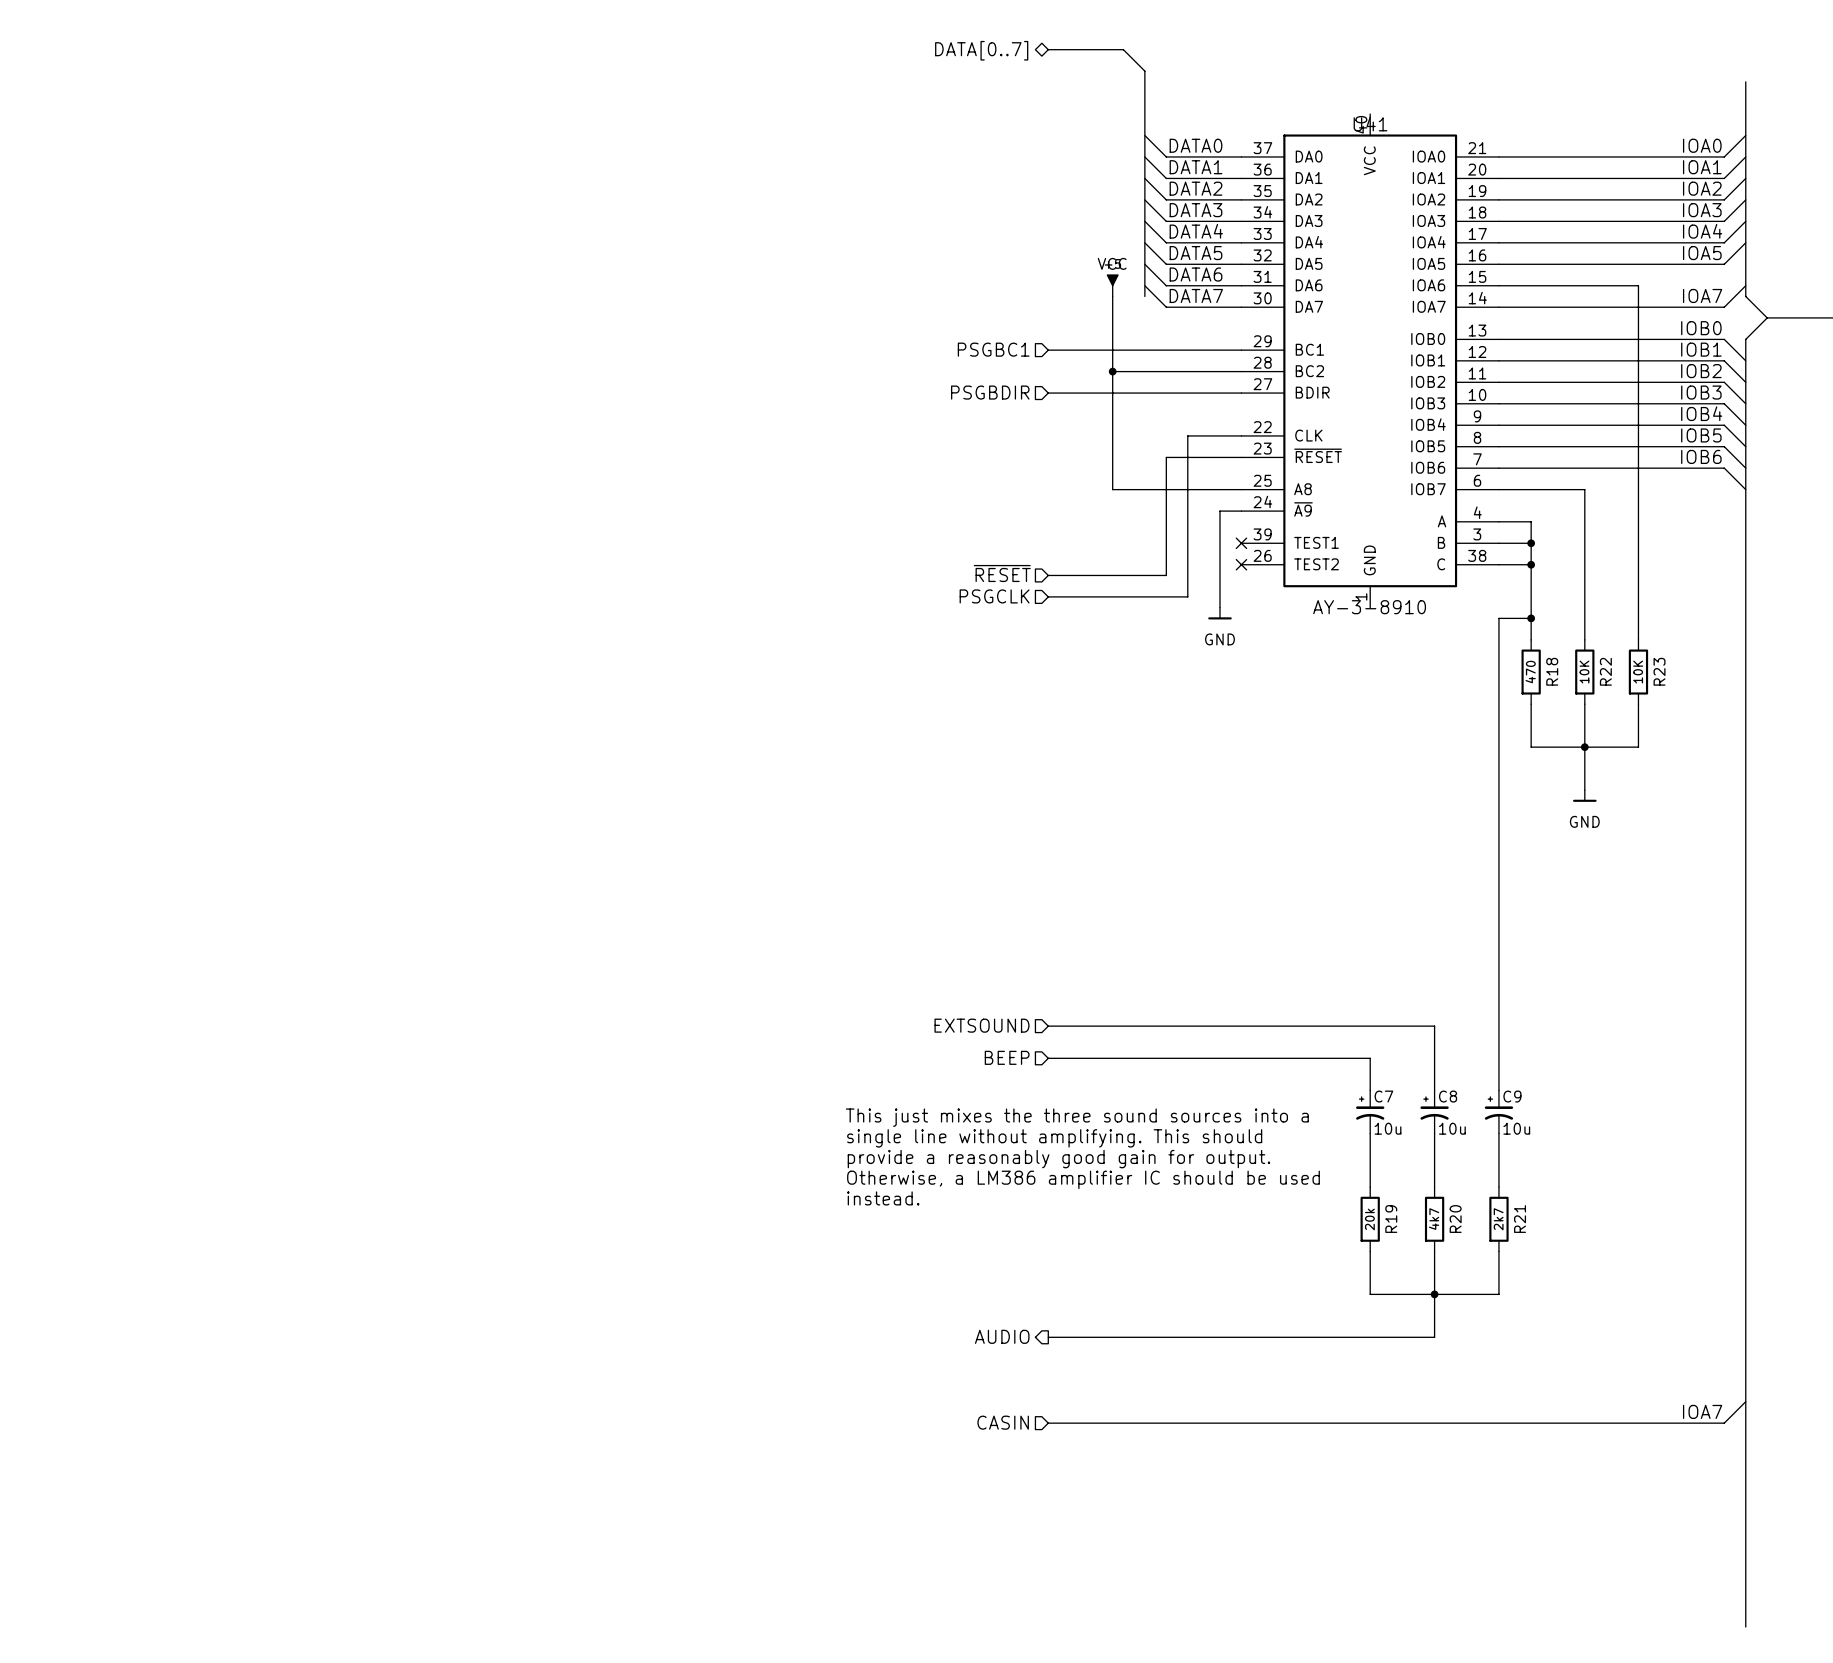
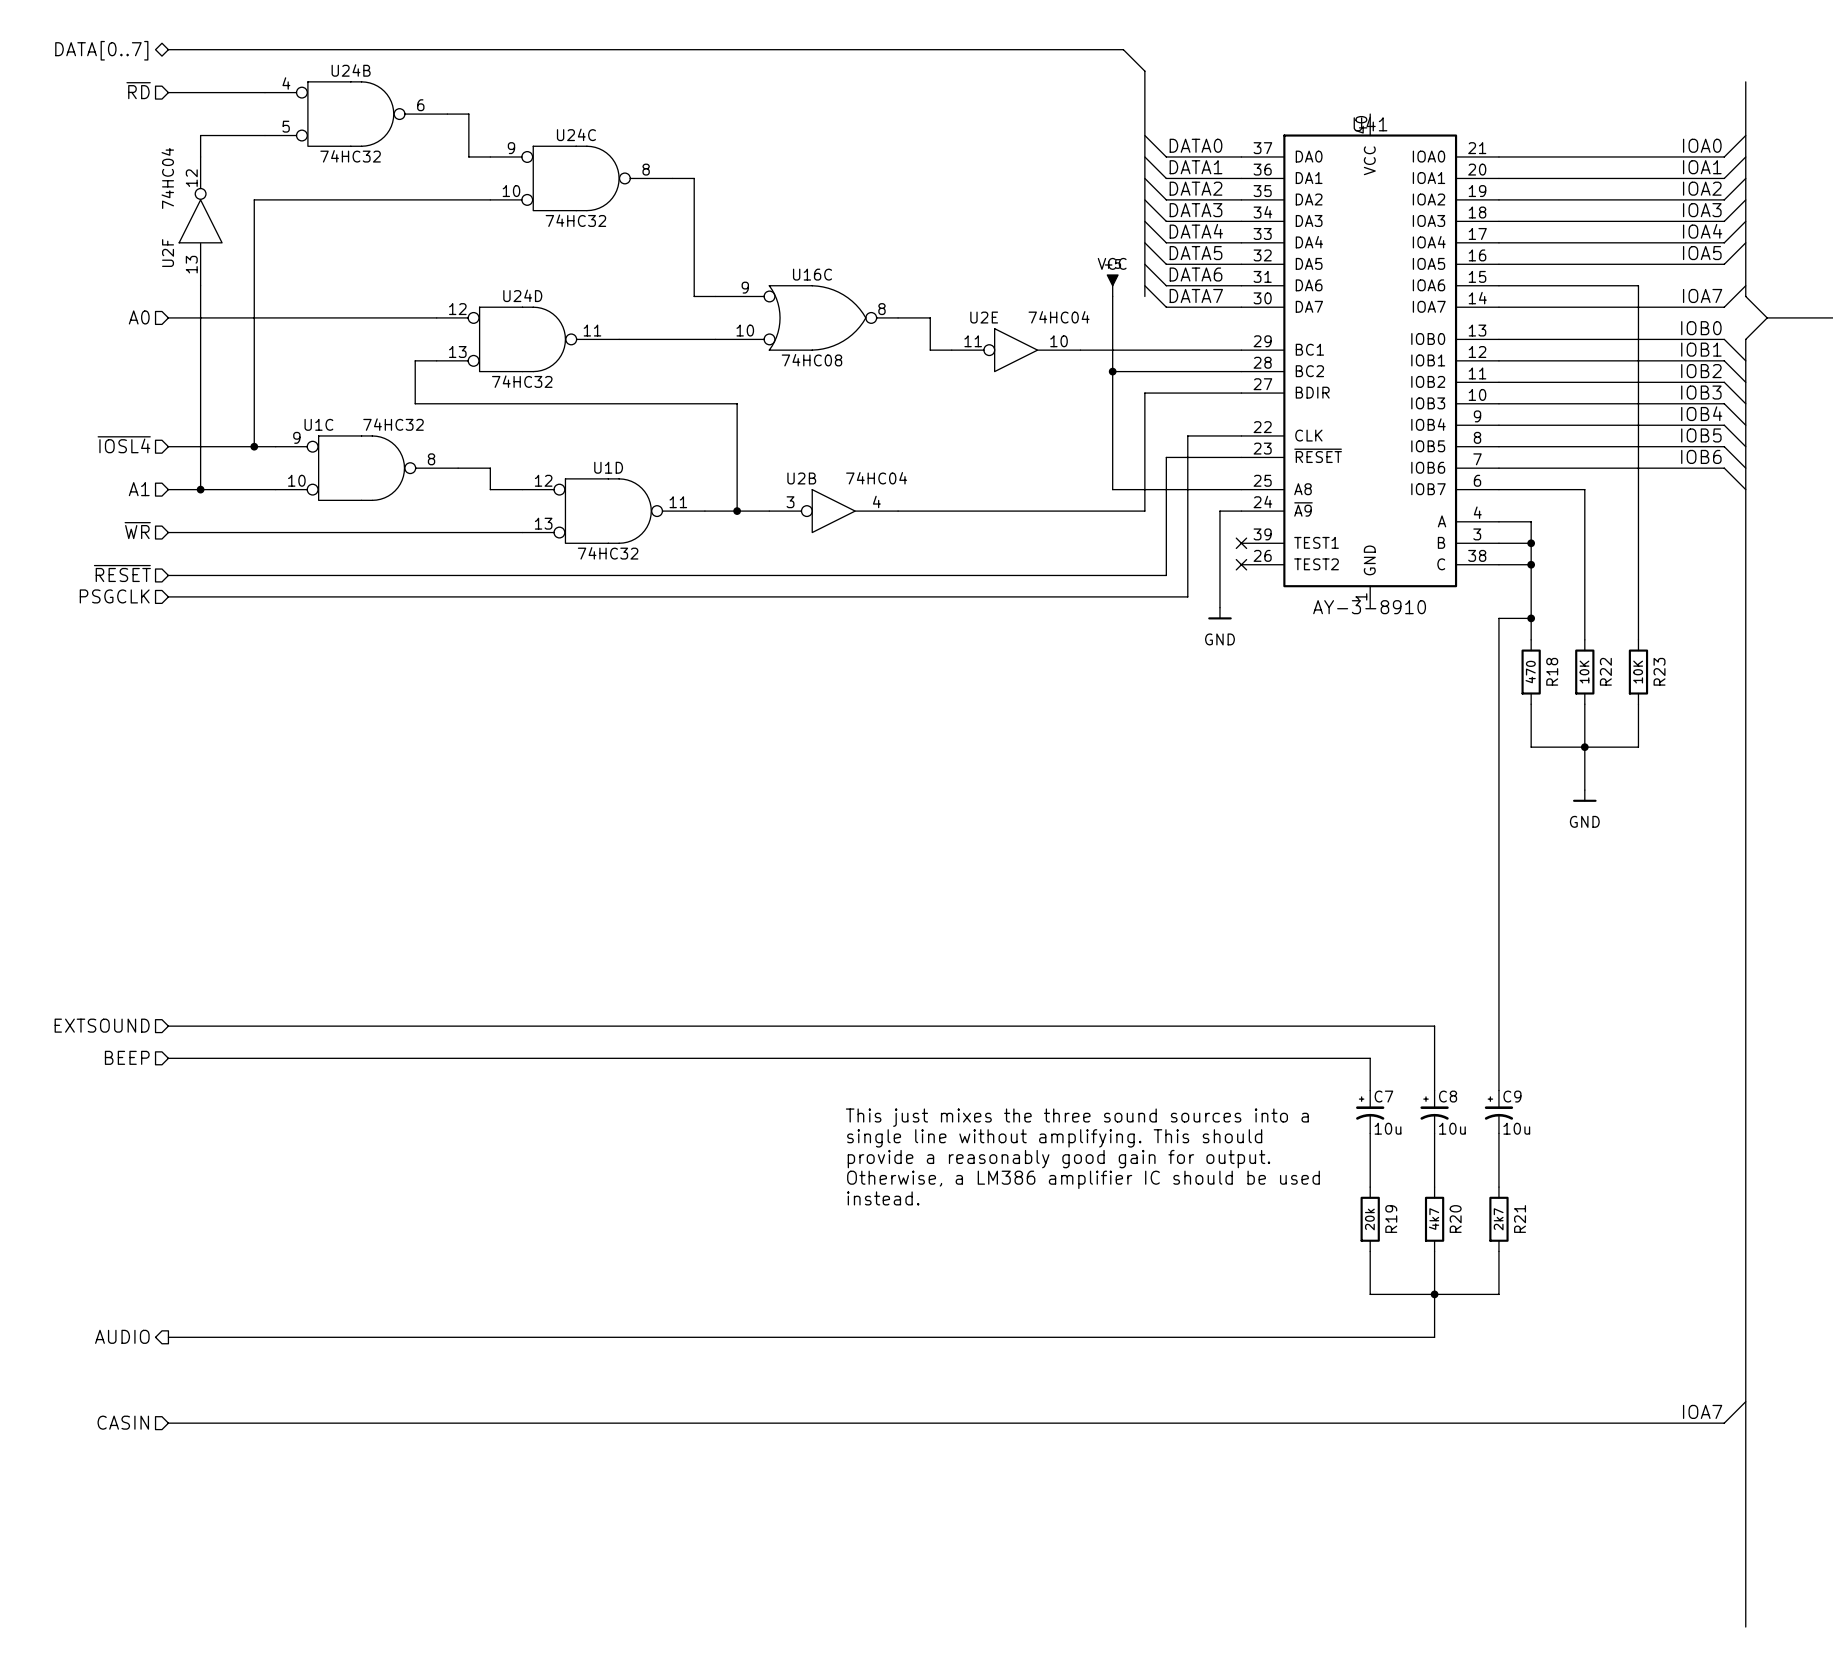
bus: none -> (168, 49) (1048, 49)
hierarchical label: none -> DATA[0..7] (101, 50)
hierarchical label: DATA[0..7] (981, 50) -> none
hierarchical label: none -> ~{RD} (138, 90)
wire: none -> (168, 92) (265, 92)
U24B: none -> 74HC32 (356, 114)
wire: none -> (447, 114) (468, 114) (468, 156) (490, 156)
wire: none -> (265, 135) (200, 135) (200, 156)
U24C: none -> 74HC32 (581, 178)
wire: none -> (672, 178) (694, 178) (694, 296) (715, 296)
wire: none -> (490, 199) (254, 199) (254, 446)
U2F: none -> 74HC04 (200, 221)
wire: none -> (200, 285) (200, 489)
hierarchical label: none -> A0 (139, 317)
wire: none -> (168, 317) (436, 317)
U16C: none -> 74HC08 (806, 317)
wire: none -> (898, 317) (930, 317) (930, 350) (951, 350)
U24D: none -> 74HC32 (527, 339)
wire: none -> (619, 339) (715, 339)
hierarchical label: PSGBC1 (993, 349) -> none
U2E: none -> 74HC04 (1016, 350)
wire: none -> (436, 360) (415, 360) (415, 403) (737, 403) (737, 511)
hierarchical label: PSGBDIR (990, 392) -> none
wire: (1048, 393) (1144, 393) -> (898, 511) (1144, 511) (1144, 393)
hierarchical label: none -> ~{IOSL4} (124, 444)
wire: none -> (168, 446) (275, 446)
junction: none -> (254, 446)
U1C: none -> 74HC32 (366, 468)
wire: none -> (458, 468) (490, 468) (490, 489) (522, 489)
hierarchical label: none -> A1 (139, 489)
wire: none -> (168, 489) (275, 489)
junction: none -> (200, 489)
U1D: none -> 74HC32 (613, 511)
wire: none -> (704, 511) (769, 511)
junction: none -> (737, 511)
U2B: none -> 74HC04 (833, 511)
hierarchical label: none -> ~{WR} (137, 530)
wire: none -> (168, 532) (522, 532)
hierarchical label: none -> ~{RESET} (122, 573)
hierarchical label: ~{RESET} (1002, 573) -> none
wire: none -> (168, 575) (1048, 575)
hierarchical label: none -> PSGCLK (114, 596)
wire: none -> (168, 596) (1048, 596)
hierarchical label: PSGCLK (994, 596) -> none
hierarchical label: none -> EXTSOUND (102, 1025)
hierarchical label: EXTSOUND (982, 1025) -> none
wire: none -> (168, 1026) (1048, 1026)
hierarchical label: none -> BEEP (127, 1057)
hierarchical label: BEEP (1007, 1057) -> none
wire: none -> (168, 1058) (1048, 1058)
hierarchical label: none -> AUDIO (122, 1336)
hierarchical label: AUDIO (1002, 1336) -> none
wire: none -> (168, 1337) (1048, 1337)
hierarchical label: none -> CASIN (123, 1422)
hierarchical label: CASIN (1003, 1422) -> none
wire: none -> (168, 1423) (1048, 1423)

